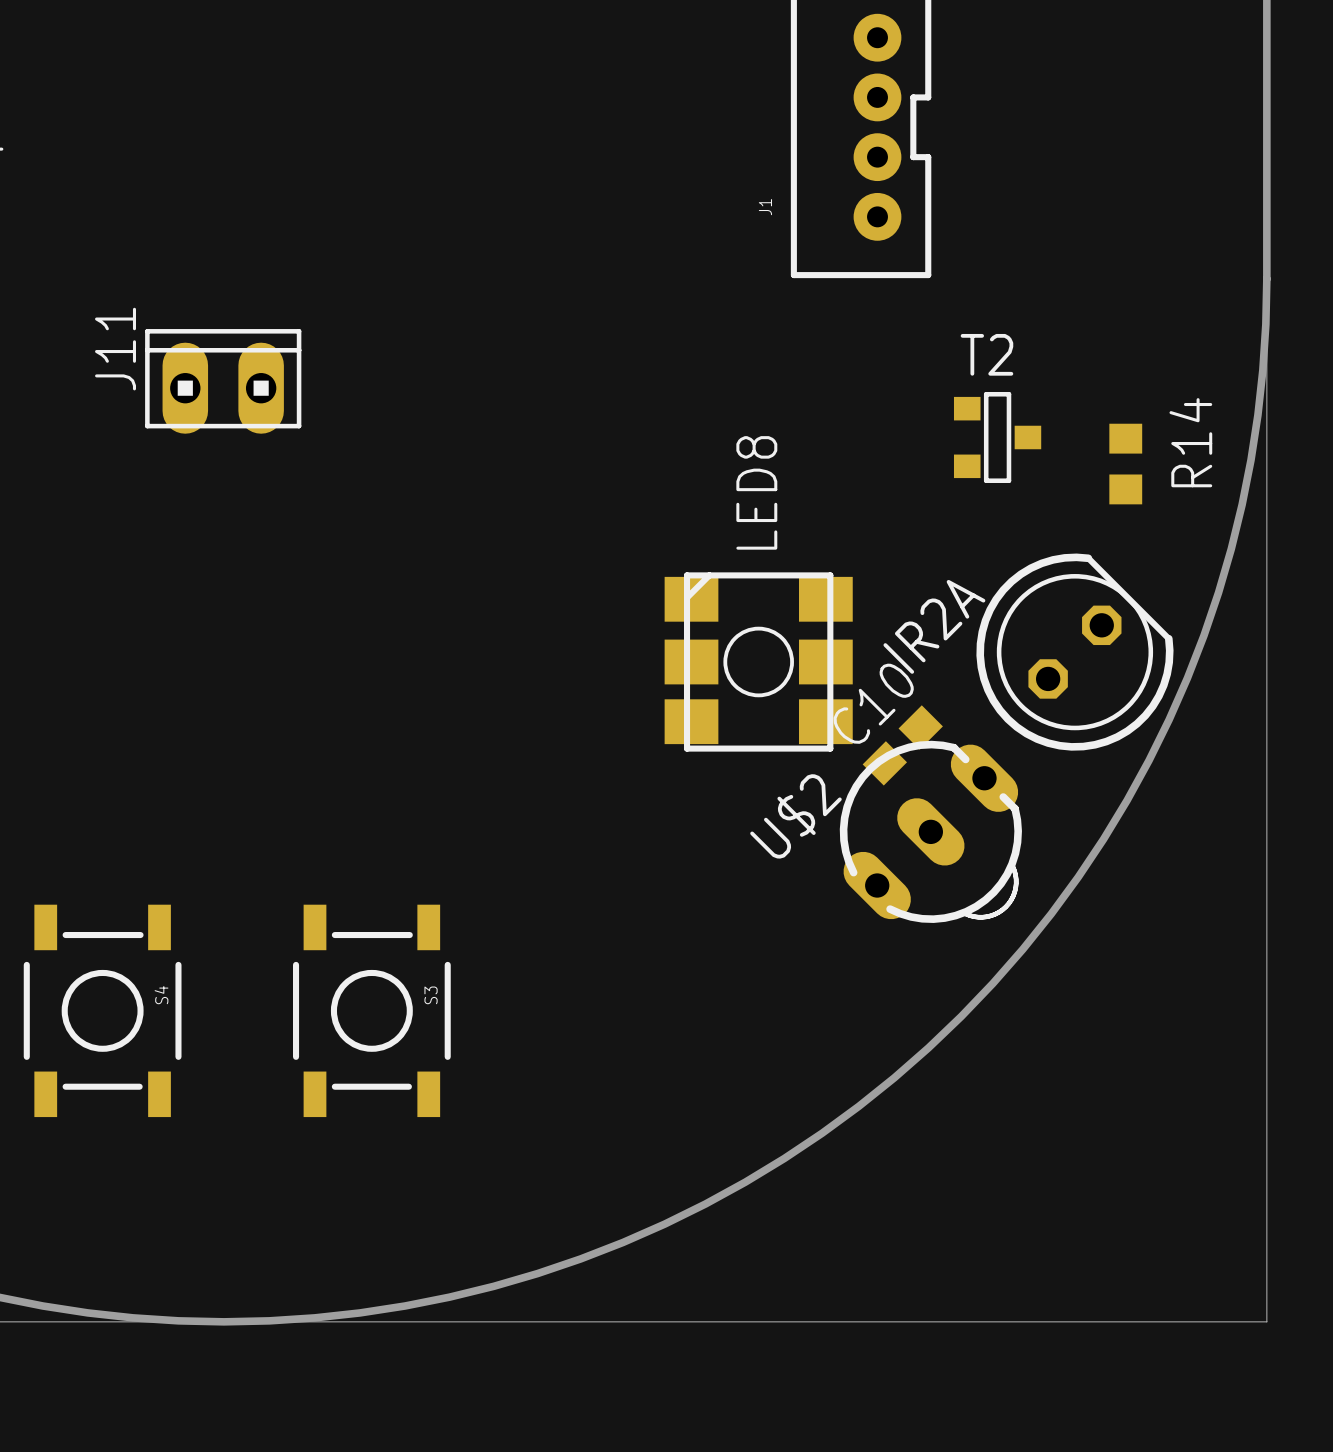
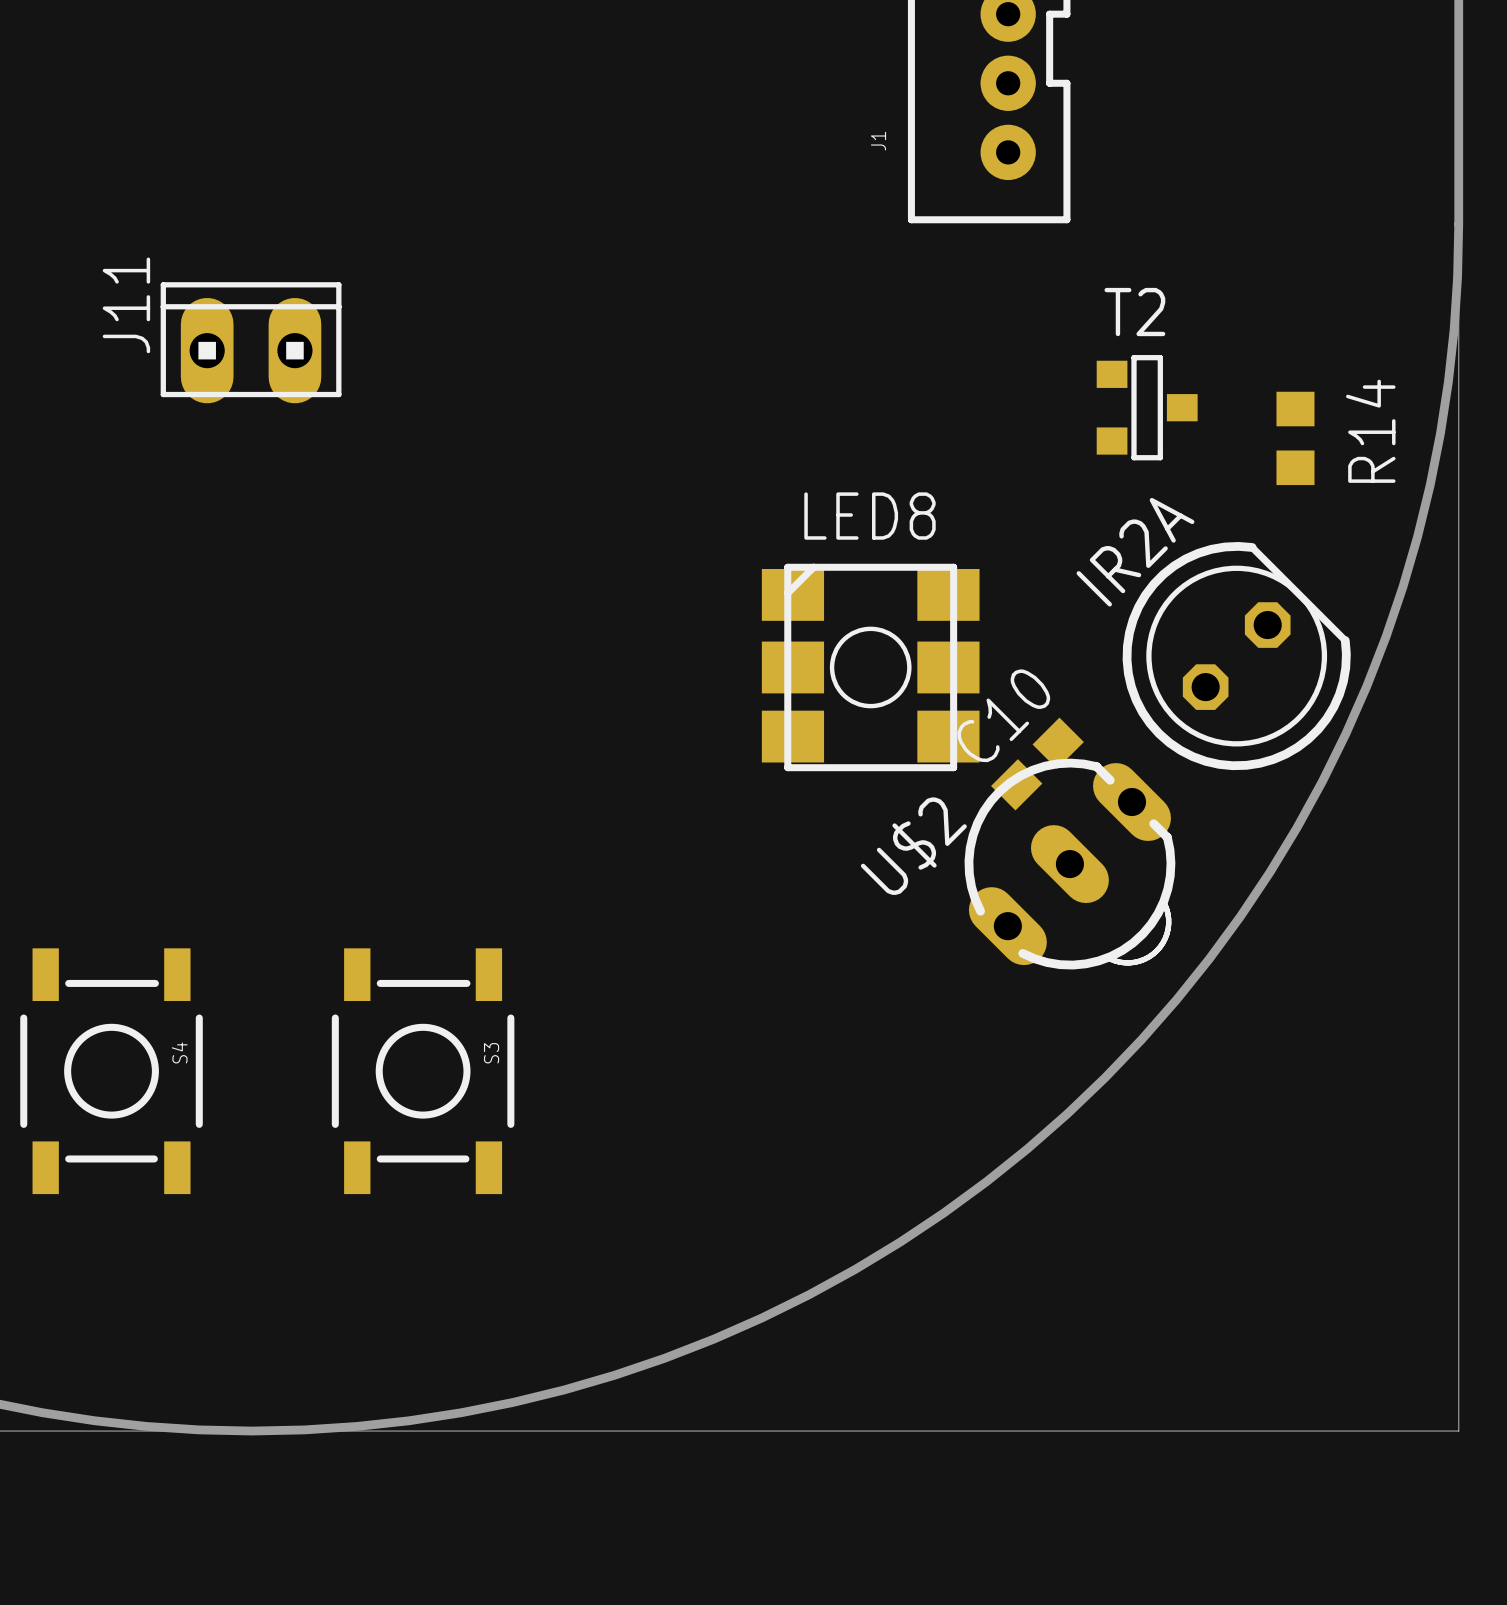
R14 name position: R14 (1190, 442) -> R14 (1370, 431)
LED8 name rotation: 0° (756, 492) -> 90° clockwise (870, 516)
IR2A name position: IR2A (934, 626) -> IR2A (1135, 552)

